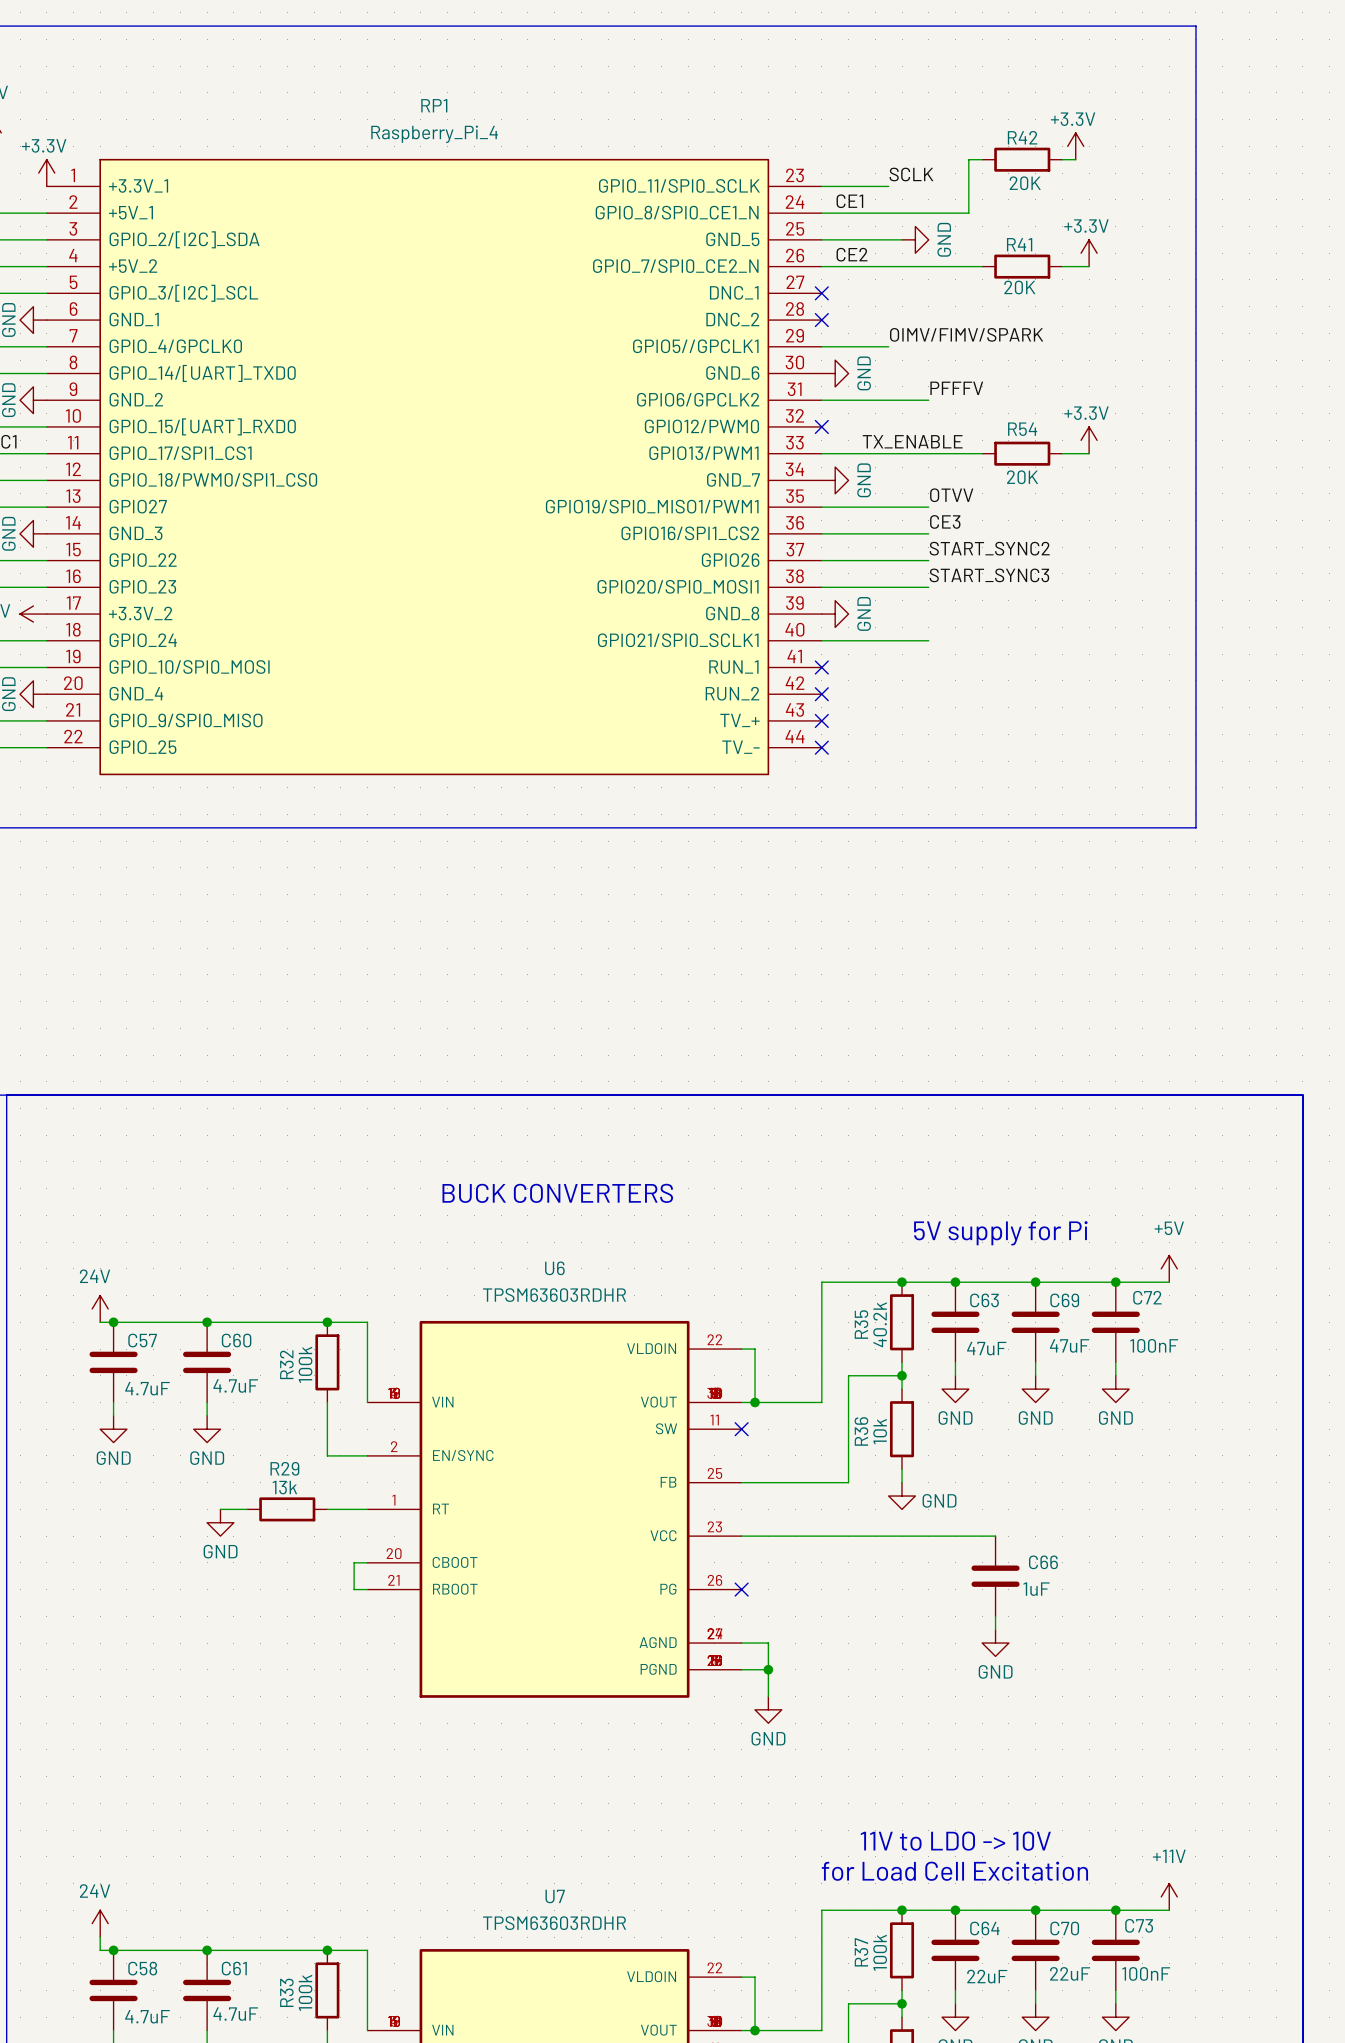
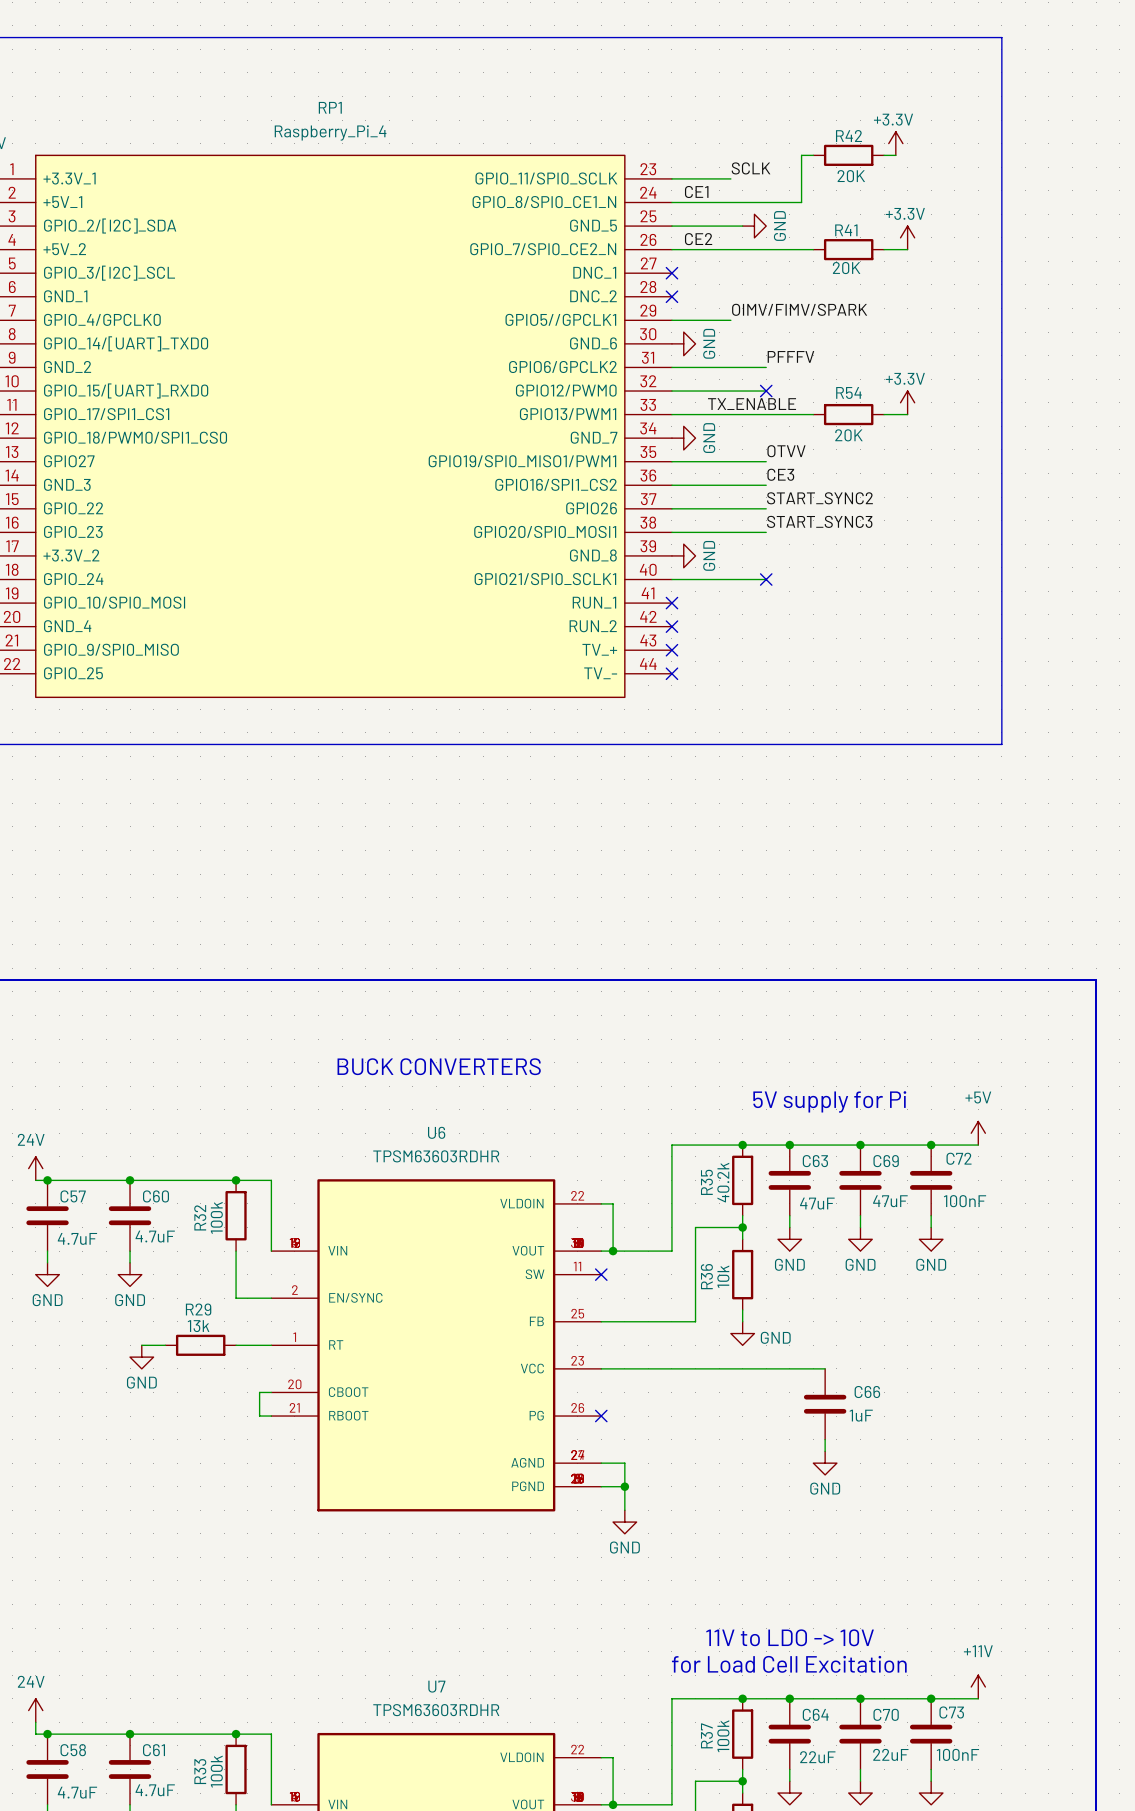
wire: none -> (671, 391) (766, 391)
no-connect mark: (821, 426) -> none
no-connect mark: none -> (766, 391)
no-connect mark: none -> (766, 579)

